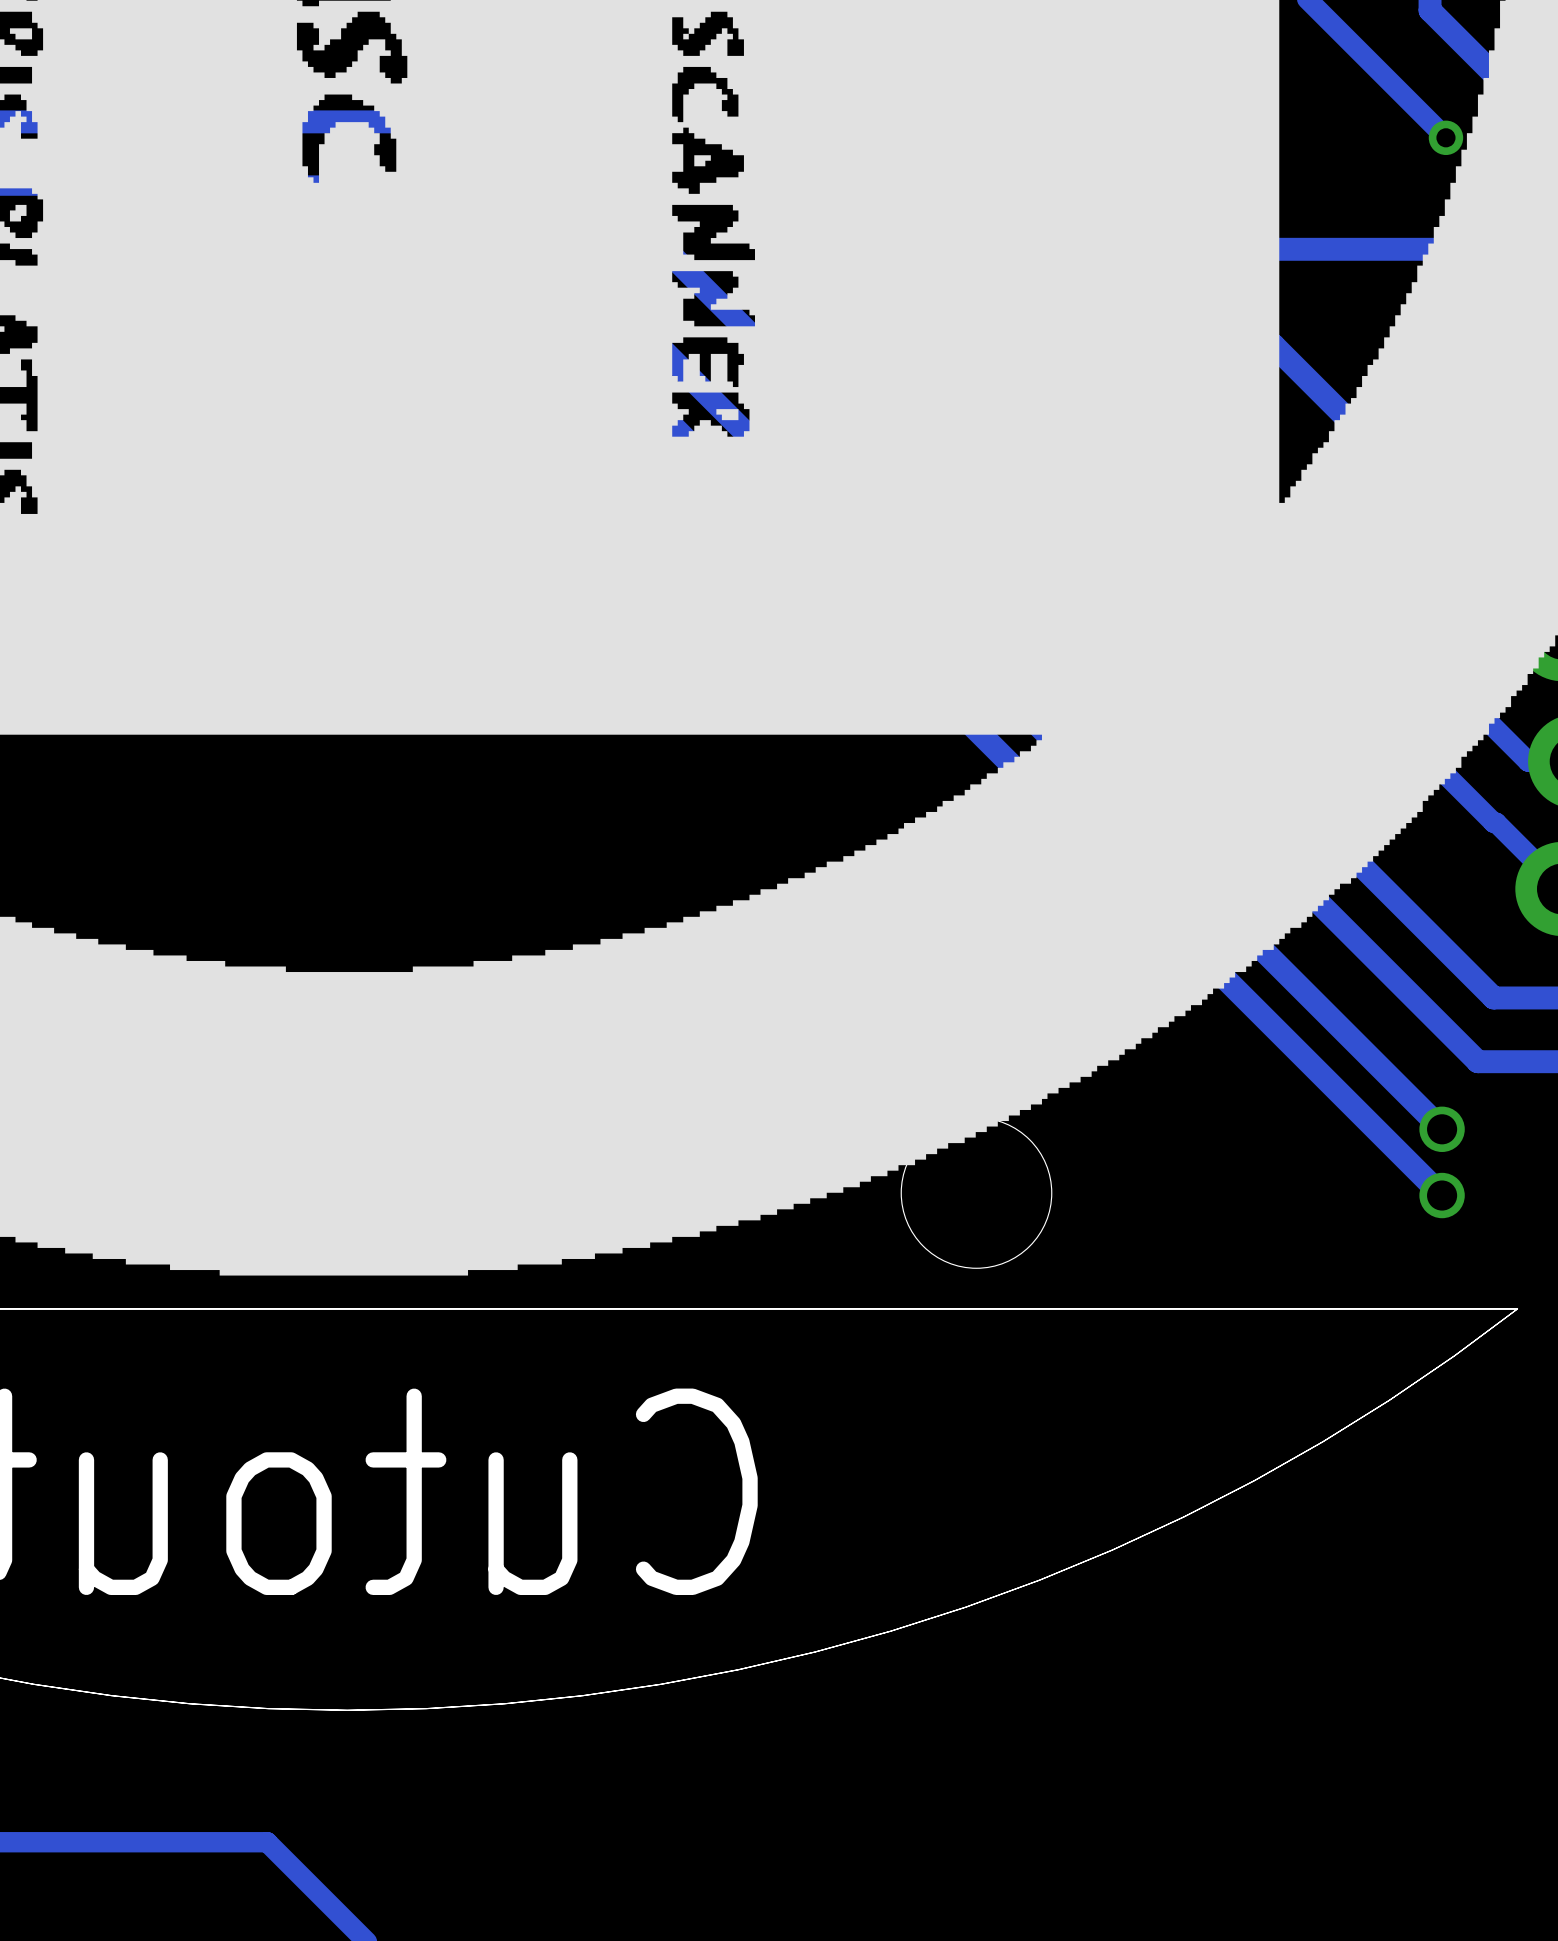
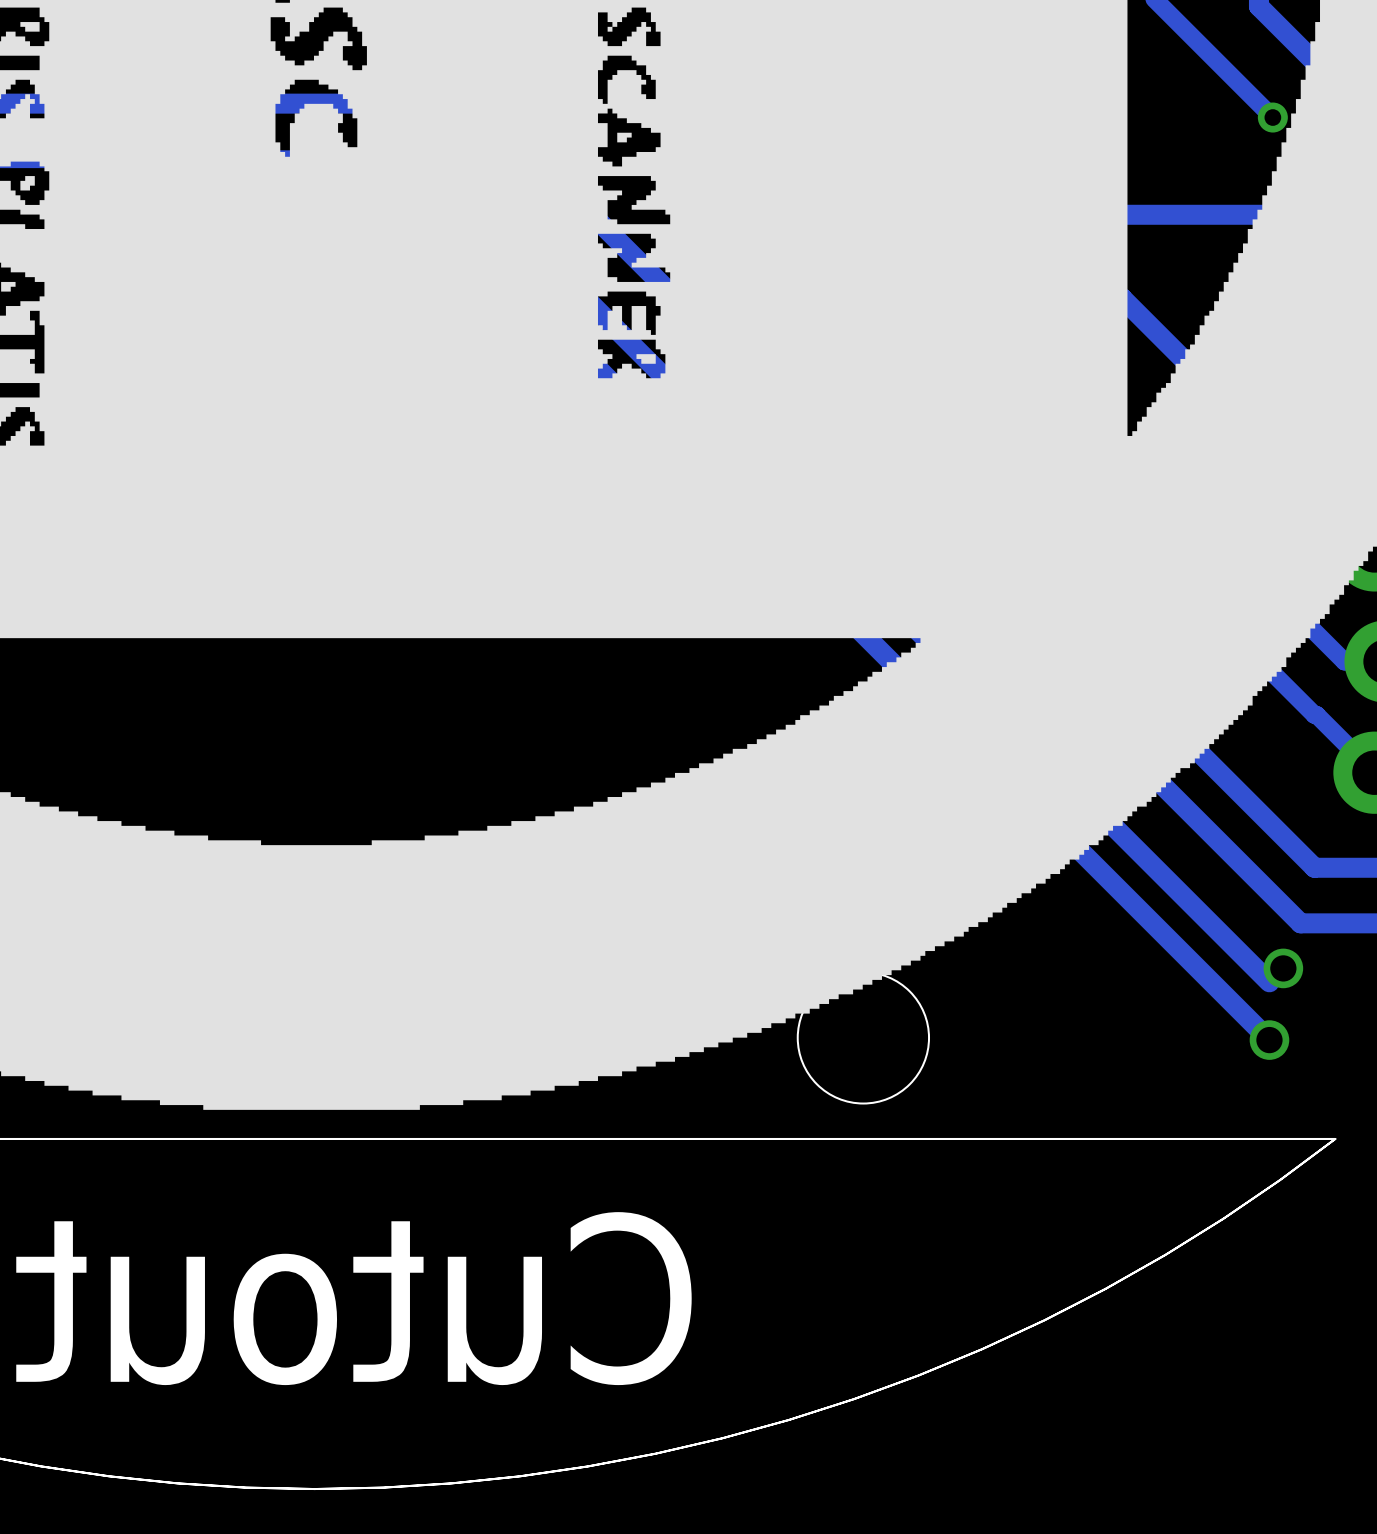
via position: (1442, 1129) -> (1283, 968)

